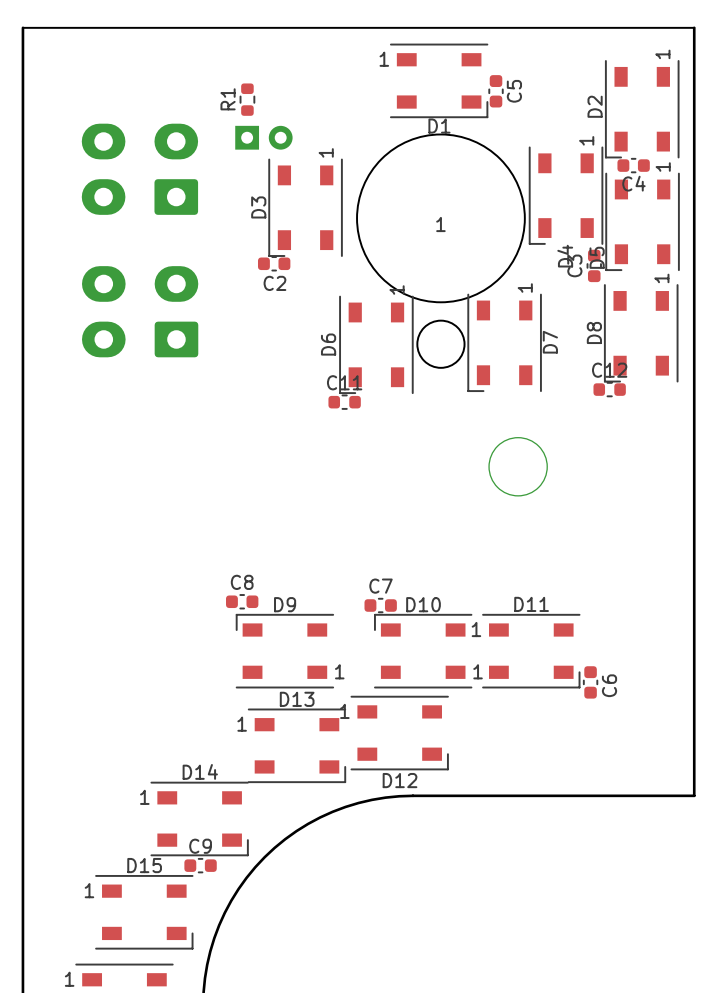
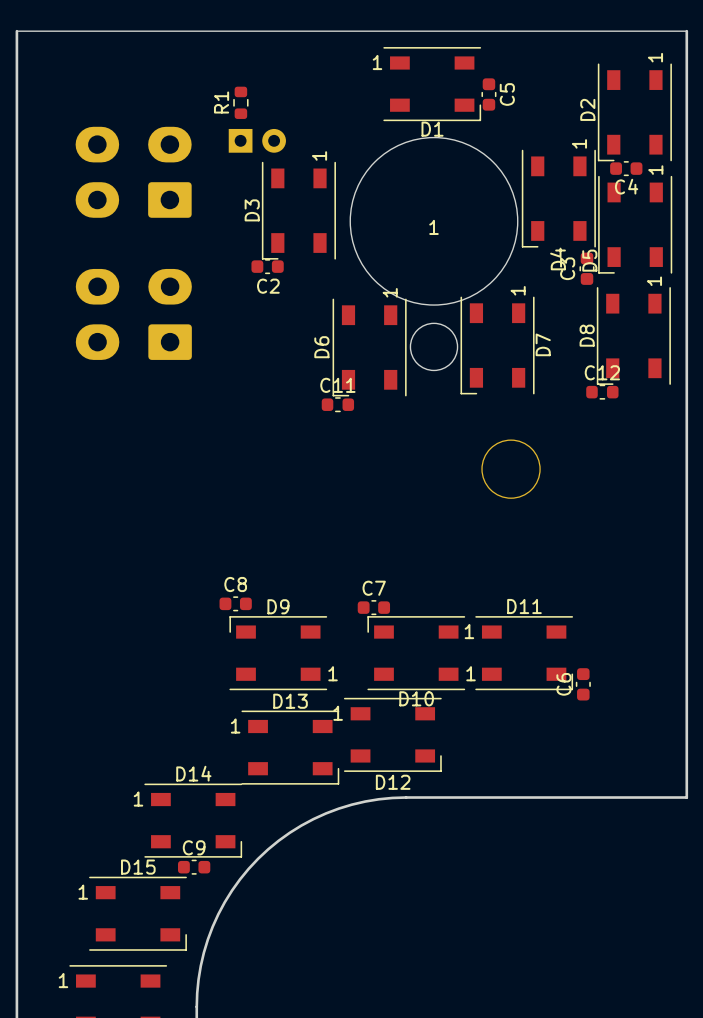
D10 name position: D10 (423, 604) -> D10 (416, 698)
C6 name position: C6 (609, 685) -> C6 (563, 684)

